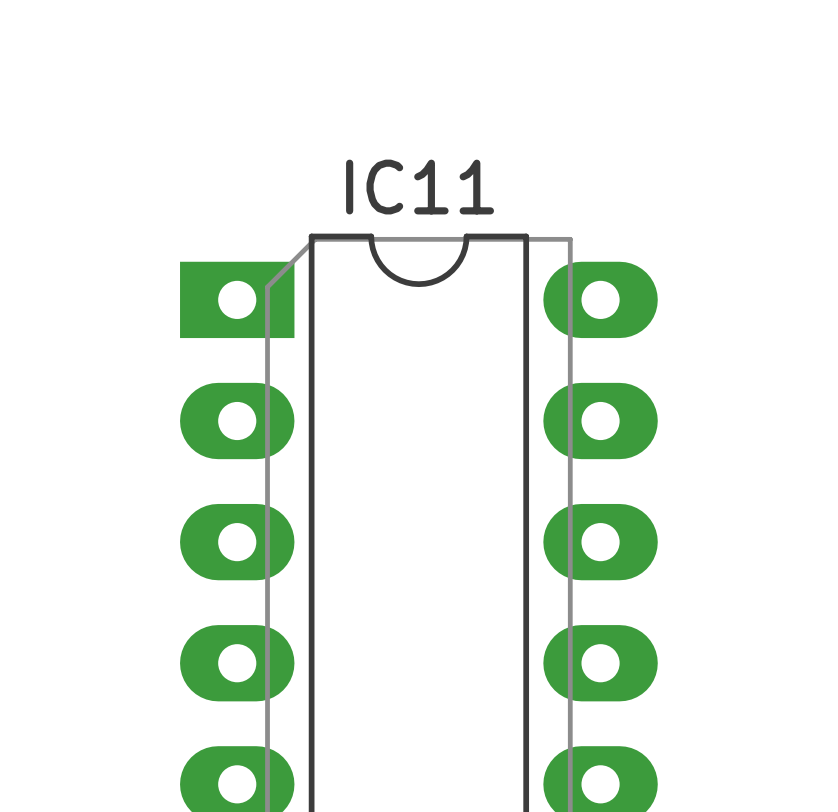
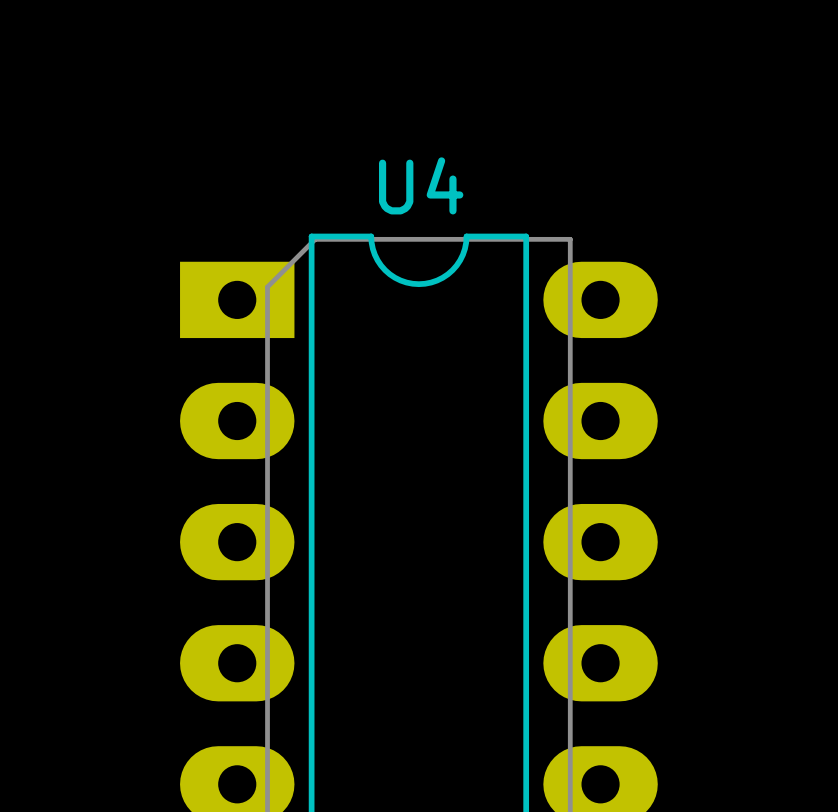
IC11 name: IC11 (420, 187) -> U4 (421, 185)

